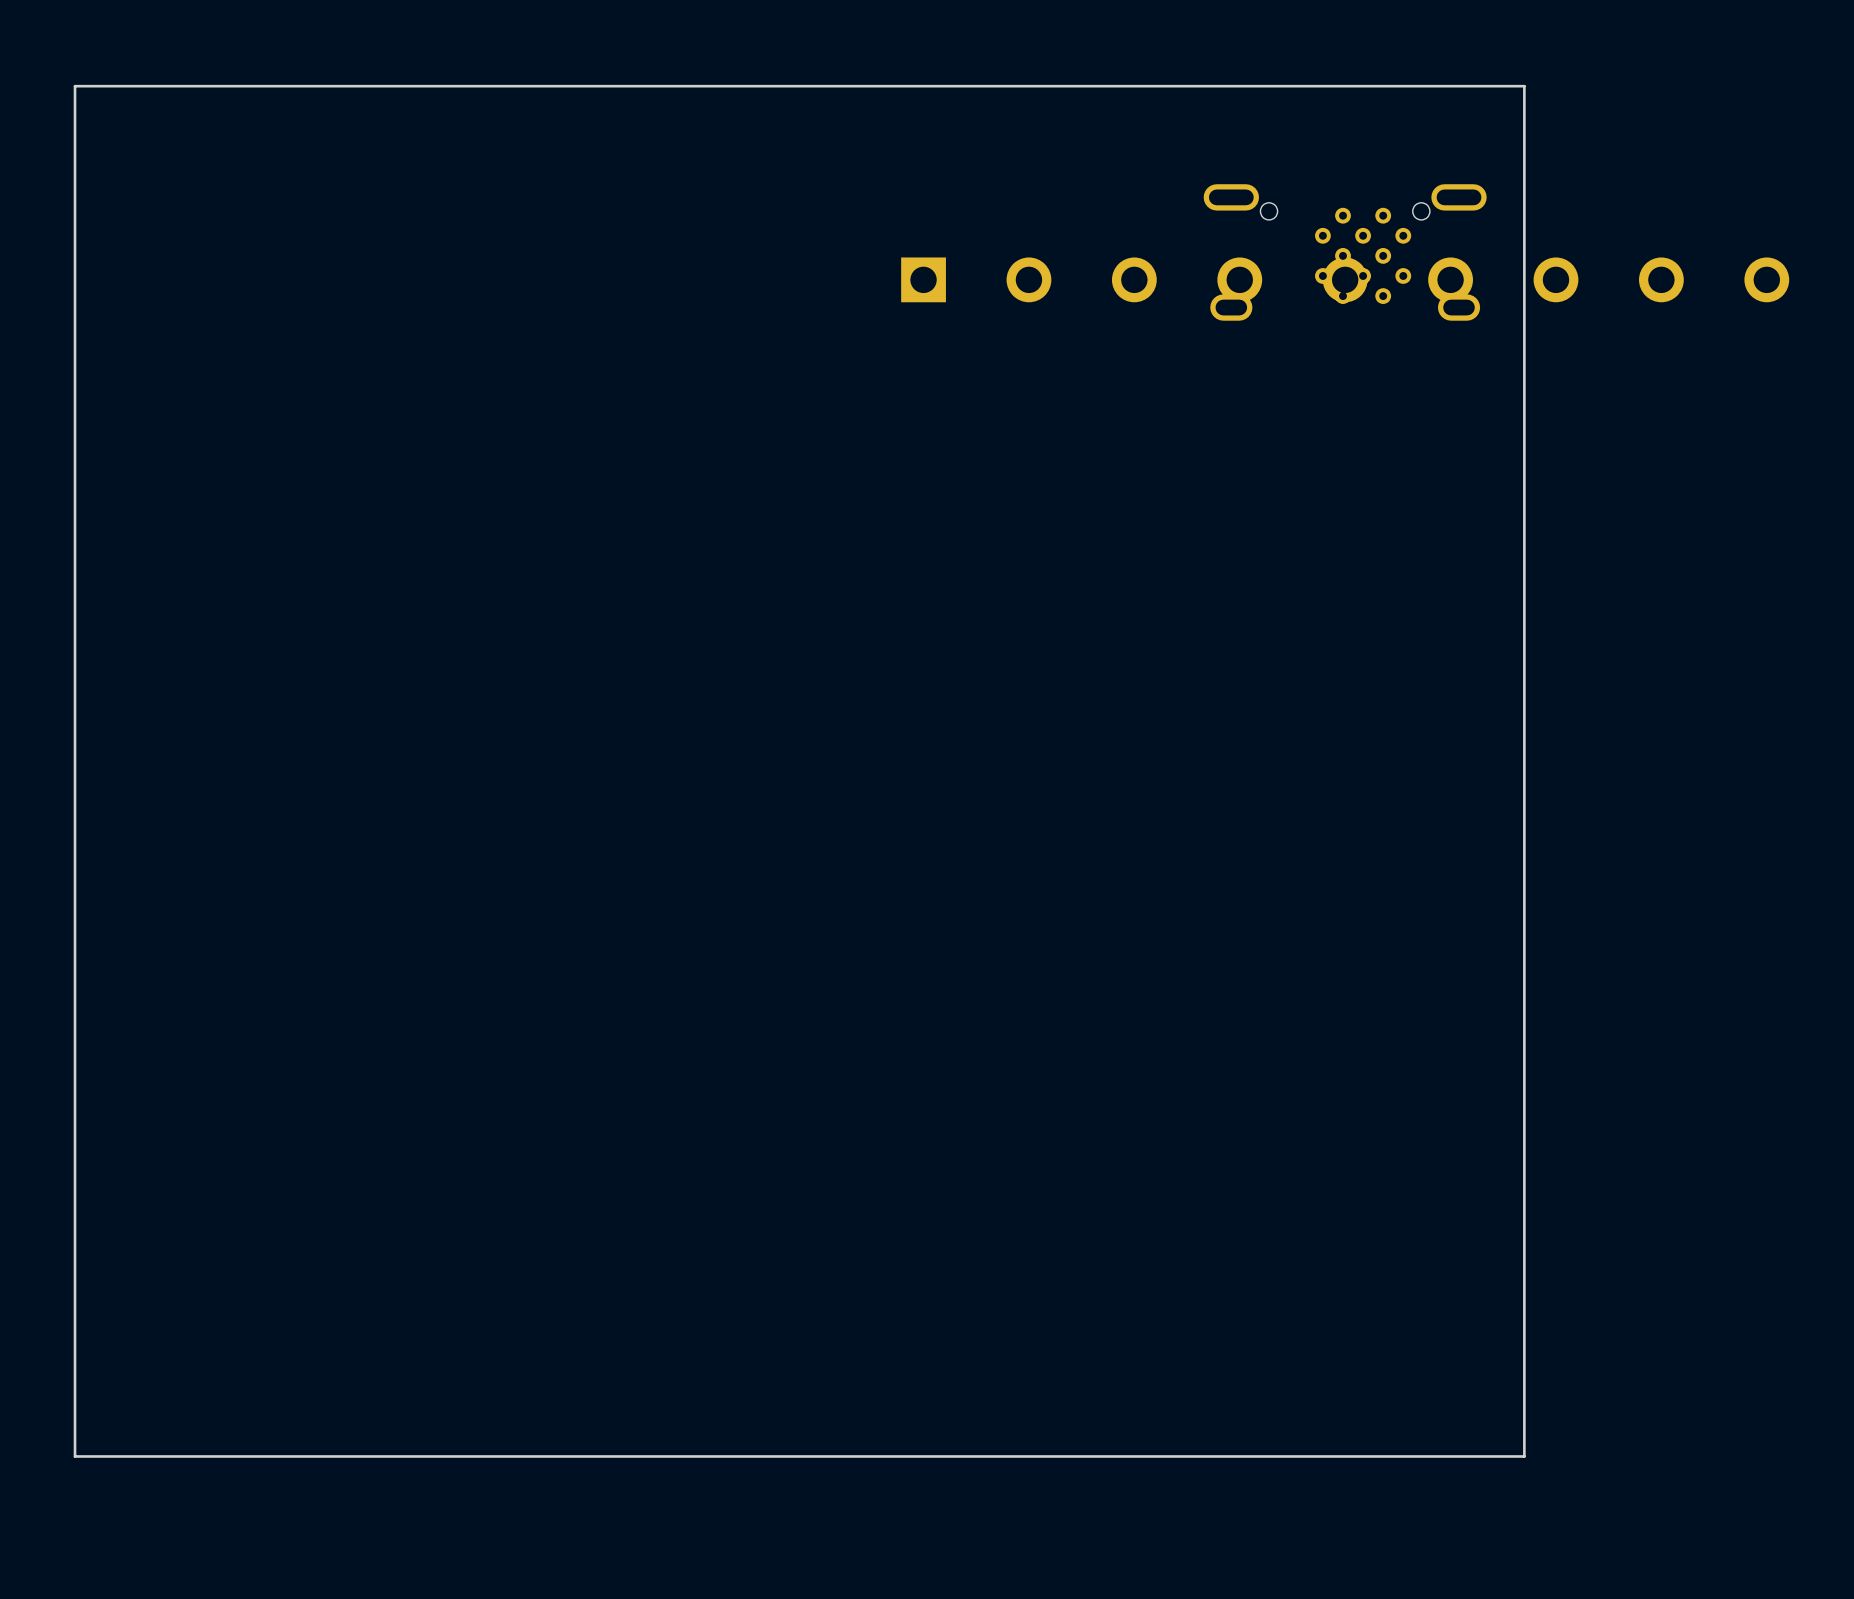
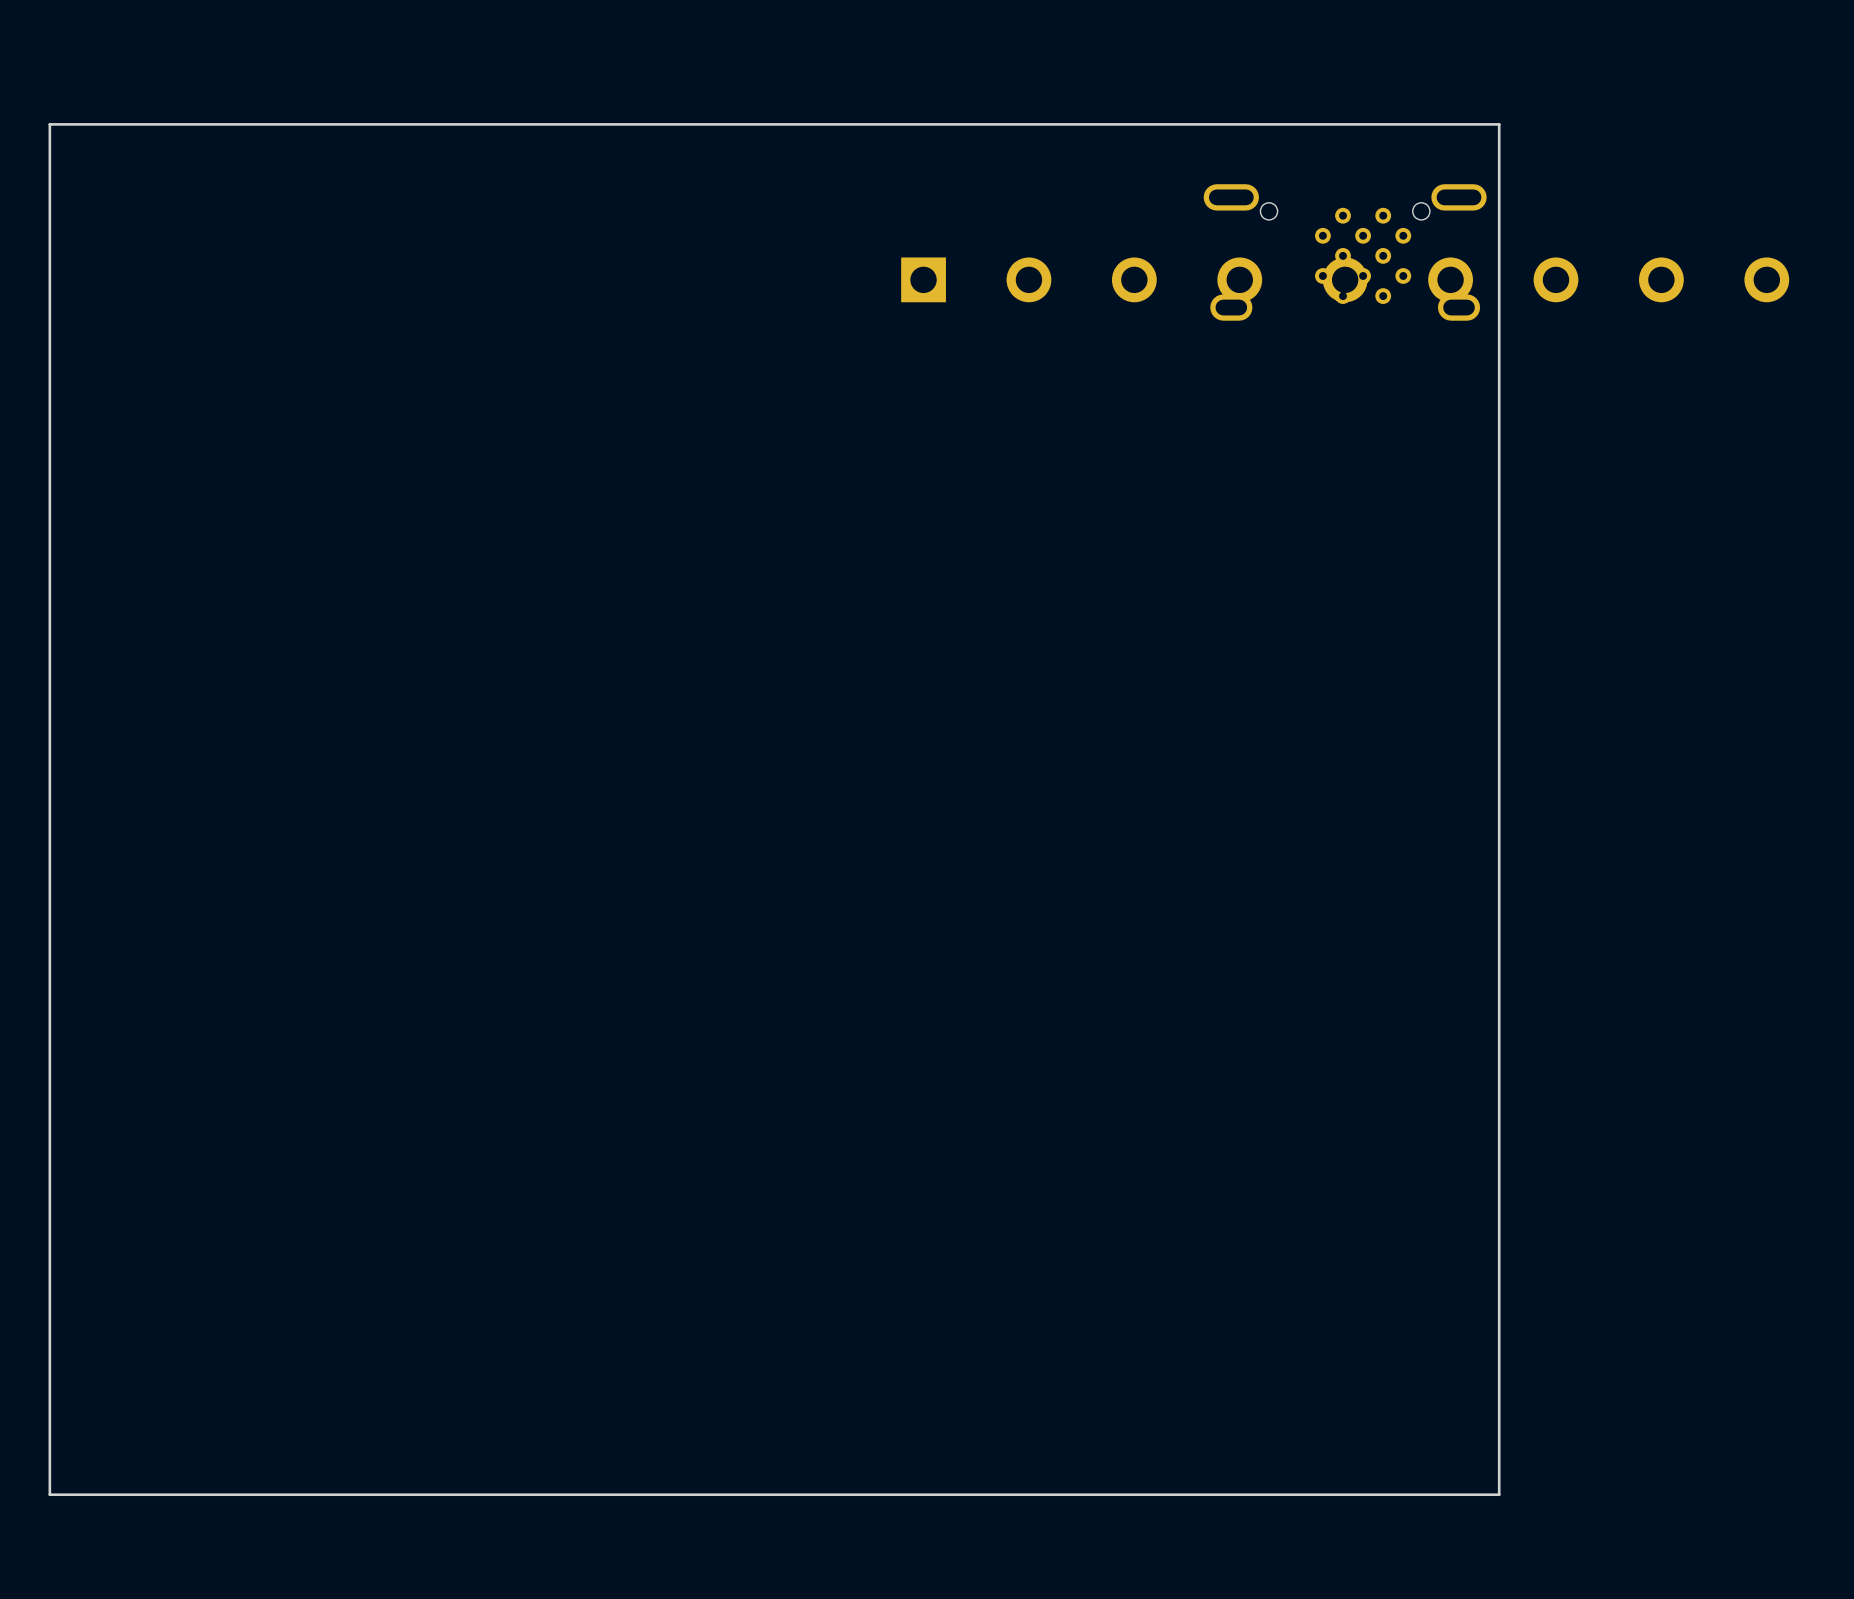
board edge: (1524, 86) (75, 86) (75, 1456) (1524, 1456) (1524, 86) -> (1499, 124) (49, 124) (49, 1494) (1499, 1494) (1499, 124)

